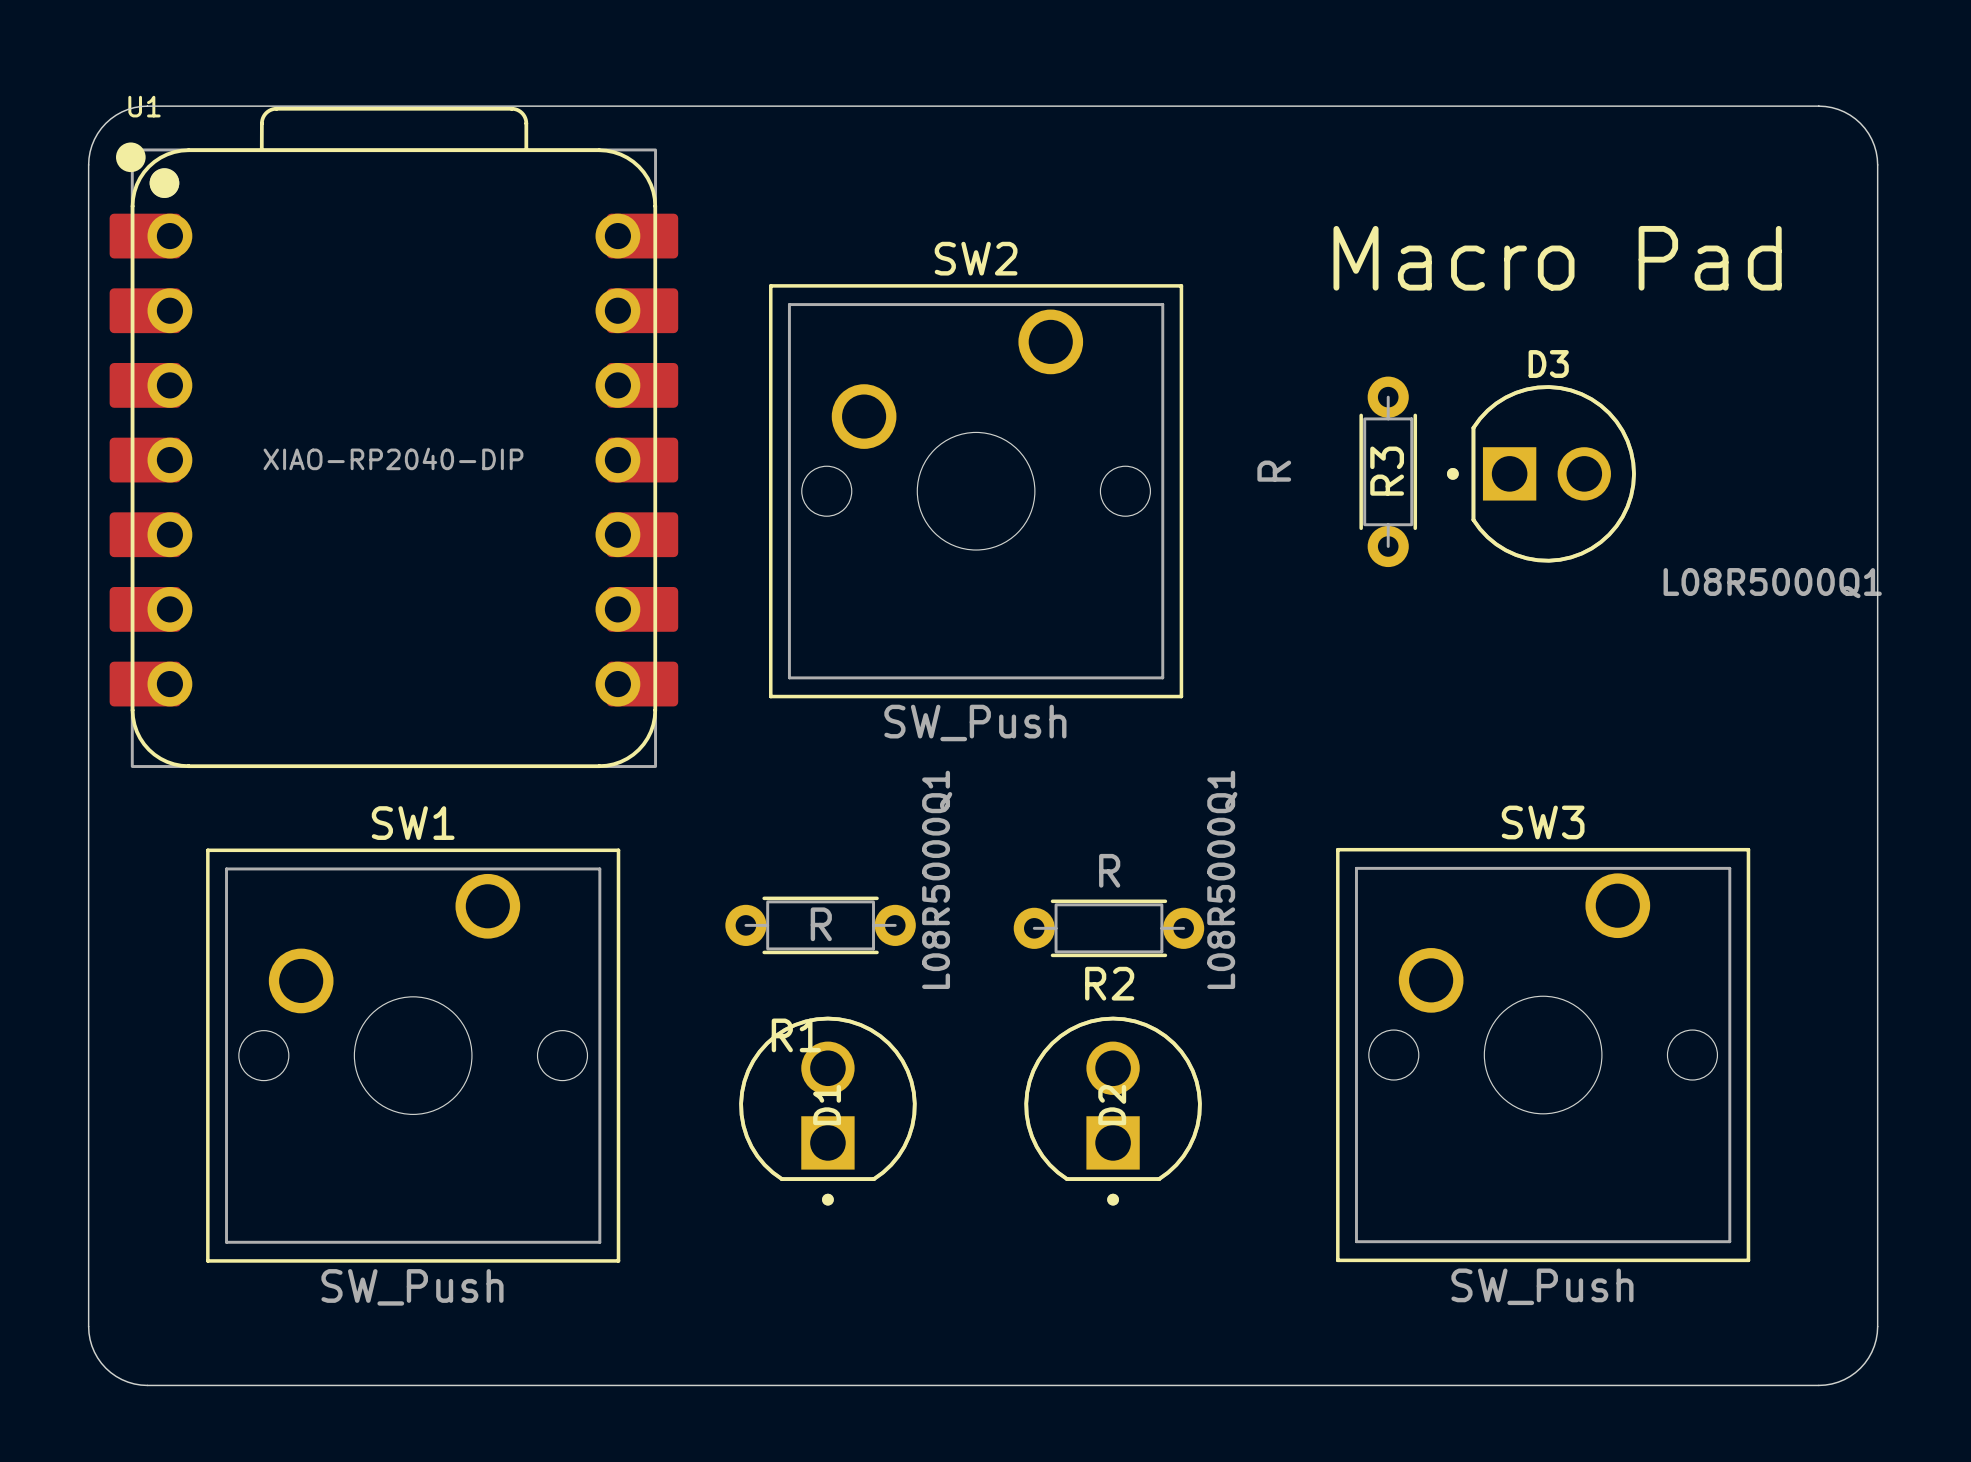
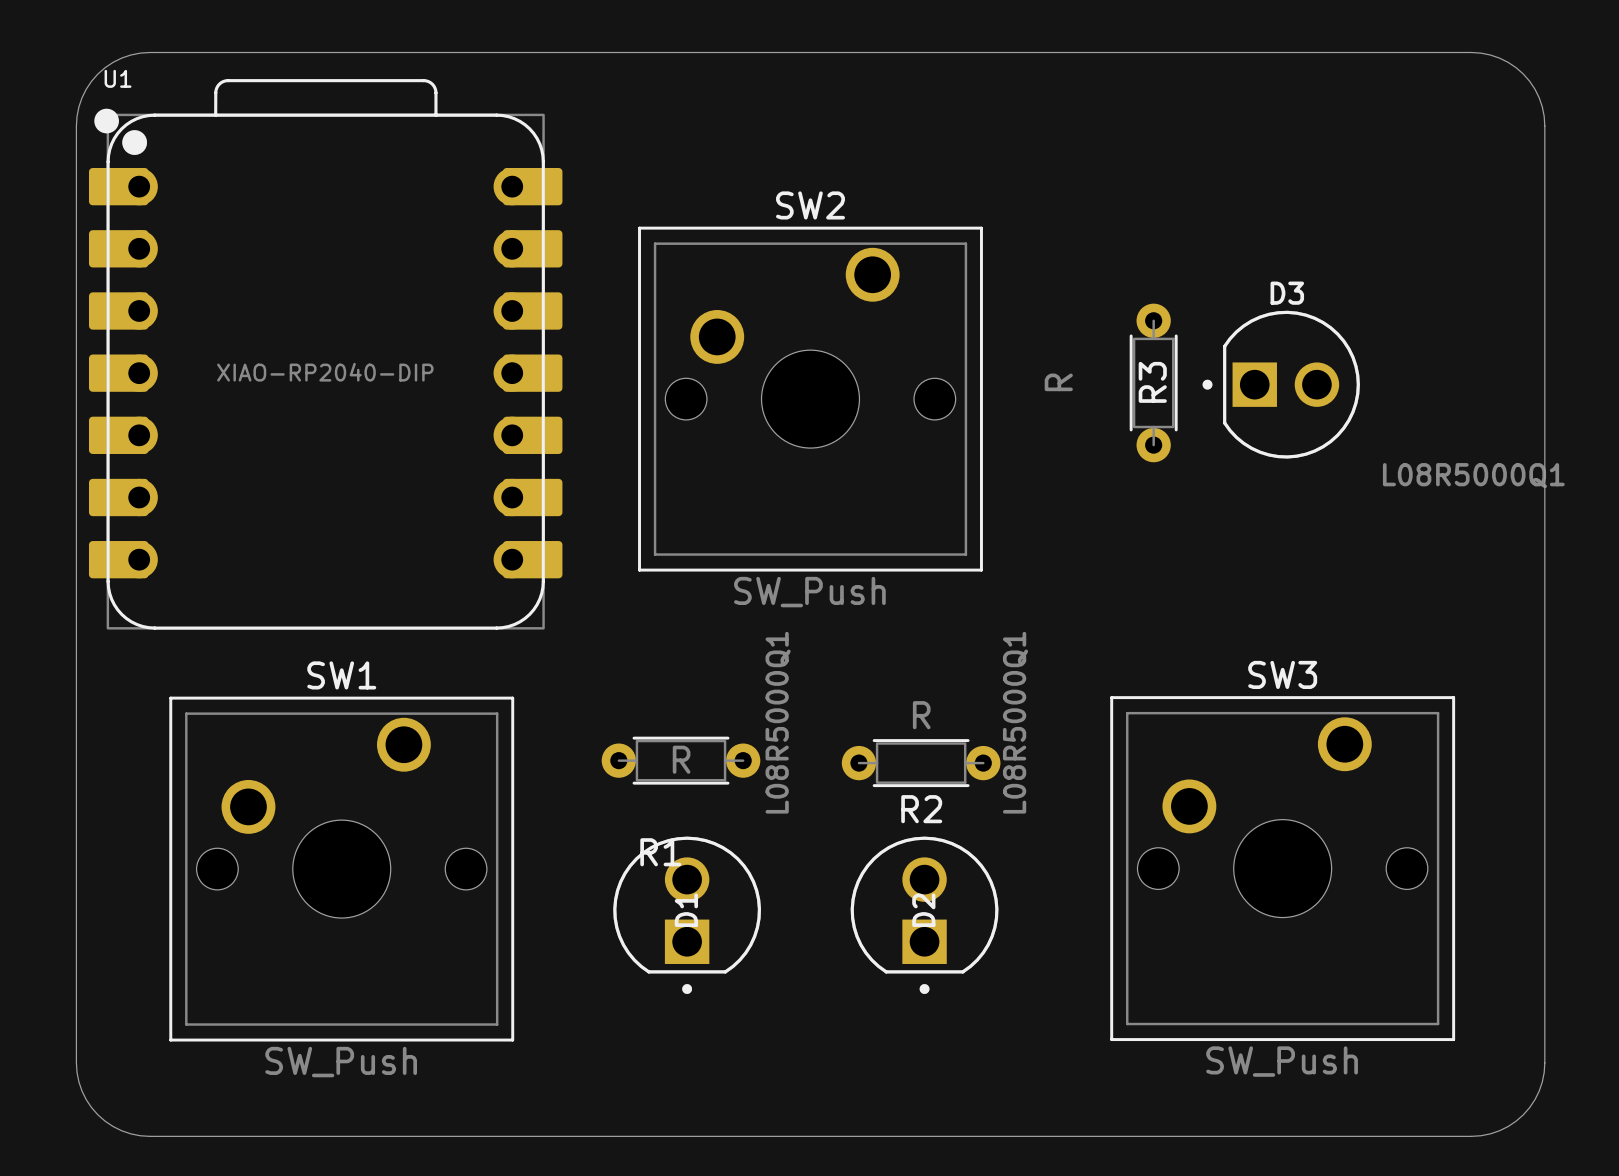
board edge: (147, 106) (1818, 106) (1838, 109) (1855, 118) (1871, 139) (1877, 164) (1877, 1326) (1874, 1346) (1864, 1363) (1844, 1379) (1818, 1385) (147, 1385) (128, 1382) (110, 1372) (94, 1352) (88, 1326) (88, 164) (91, 145) (105, 123) (121, 111) (147, 106) -> (149, 52) (121, 58) (97, 74) (82, 97) (76, 125) (76, 1062) (82, 1091) (91, 1107) (105, 1121) (130, 1133) (149, 1136) (1471, 1136) (1490, 1133) (1508, 1126) (1529, 1107) (1539, 1091) (1544, 1062) (1544, 125) (1542, 106) (1534, 89) (1516, 67) (1490, 55) (1471, 52) (149, 52)
text: Macro Pad (1557, 258) -> none

